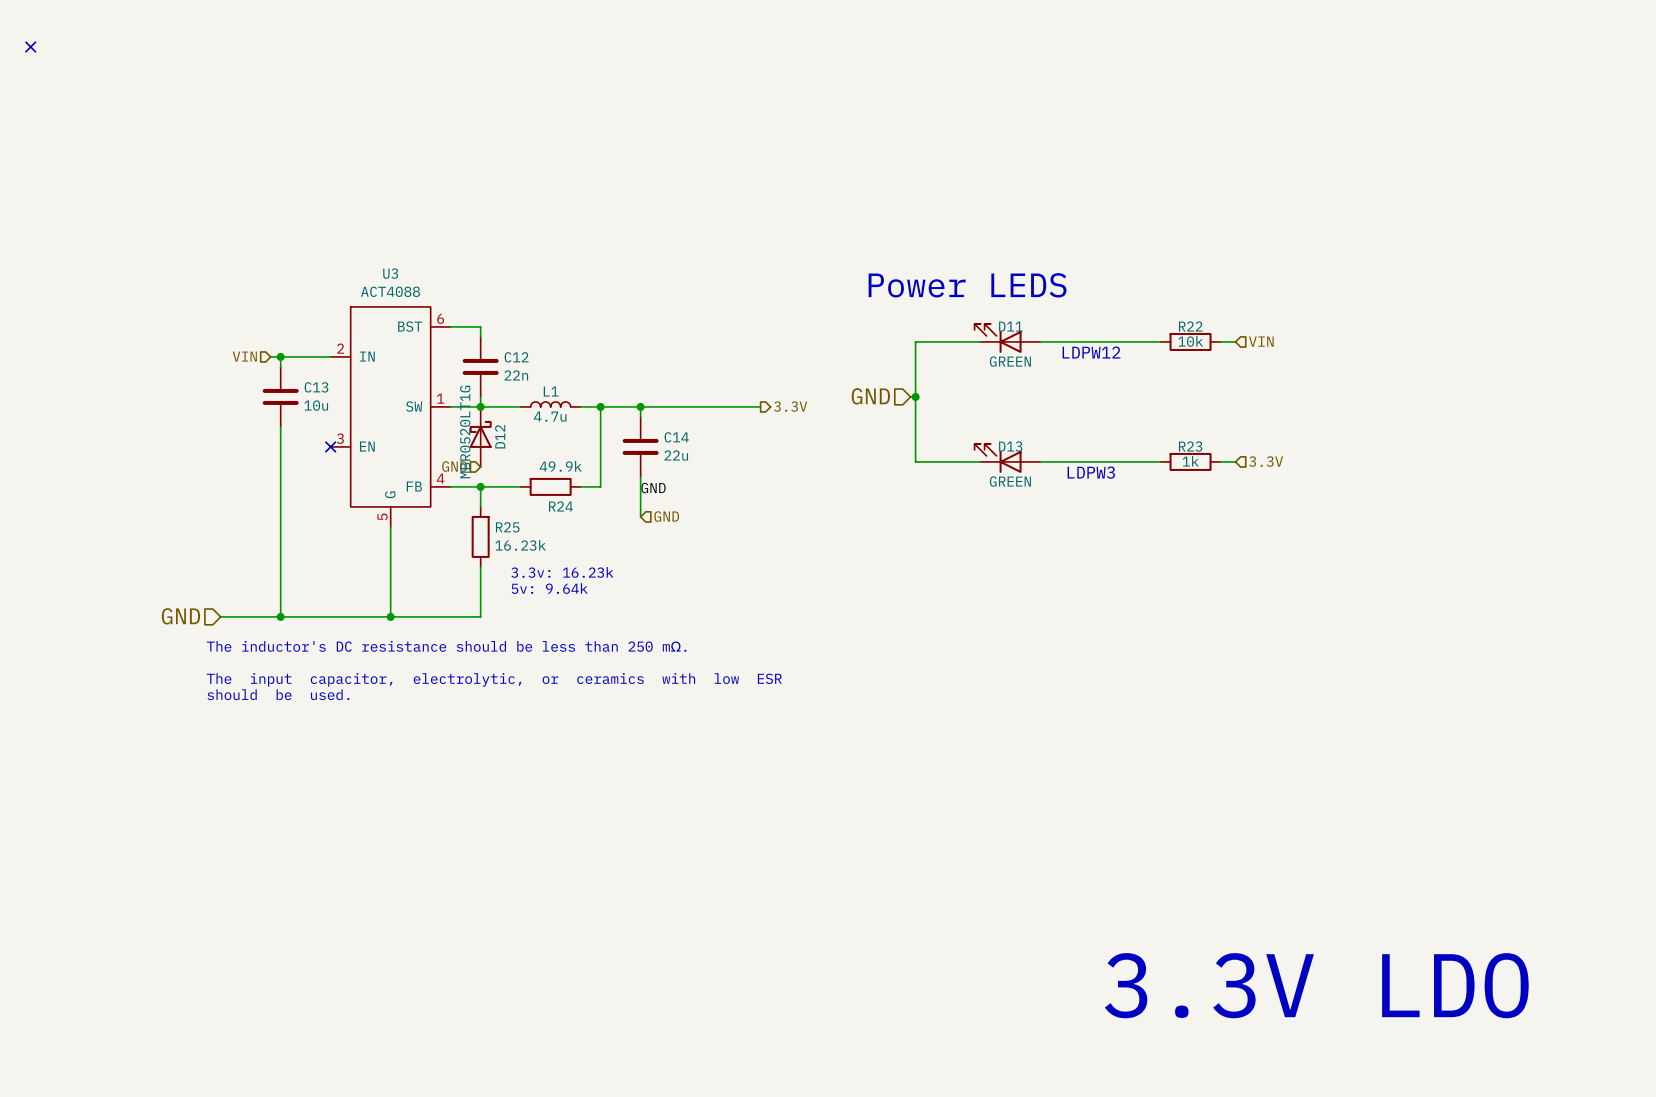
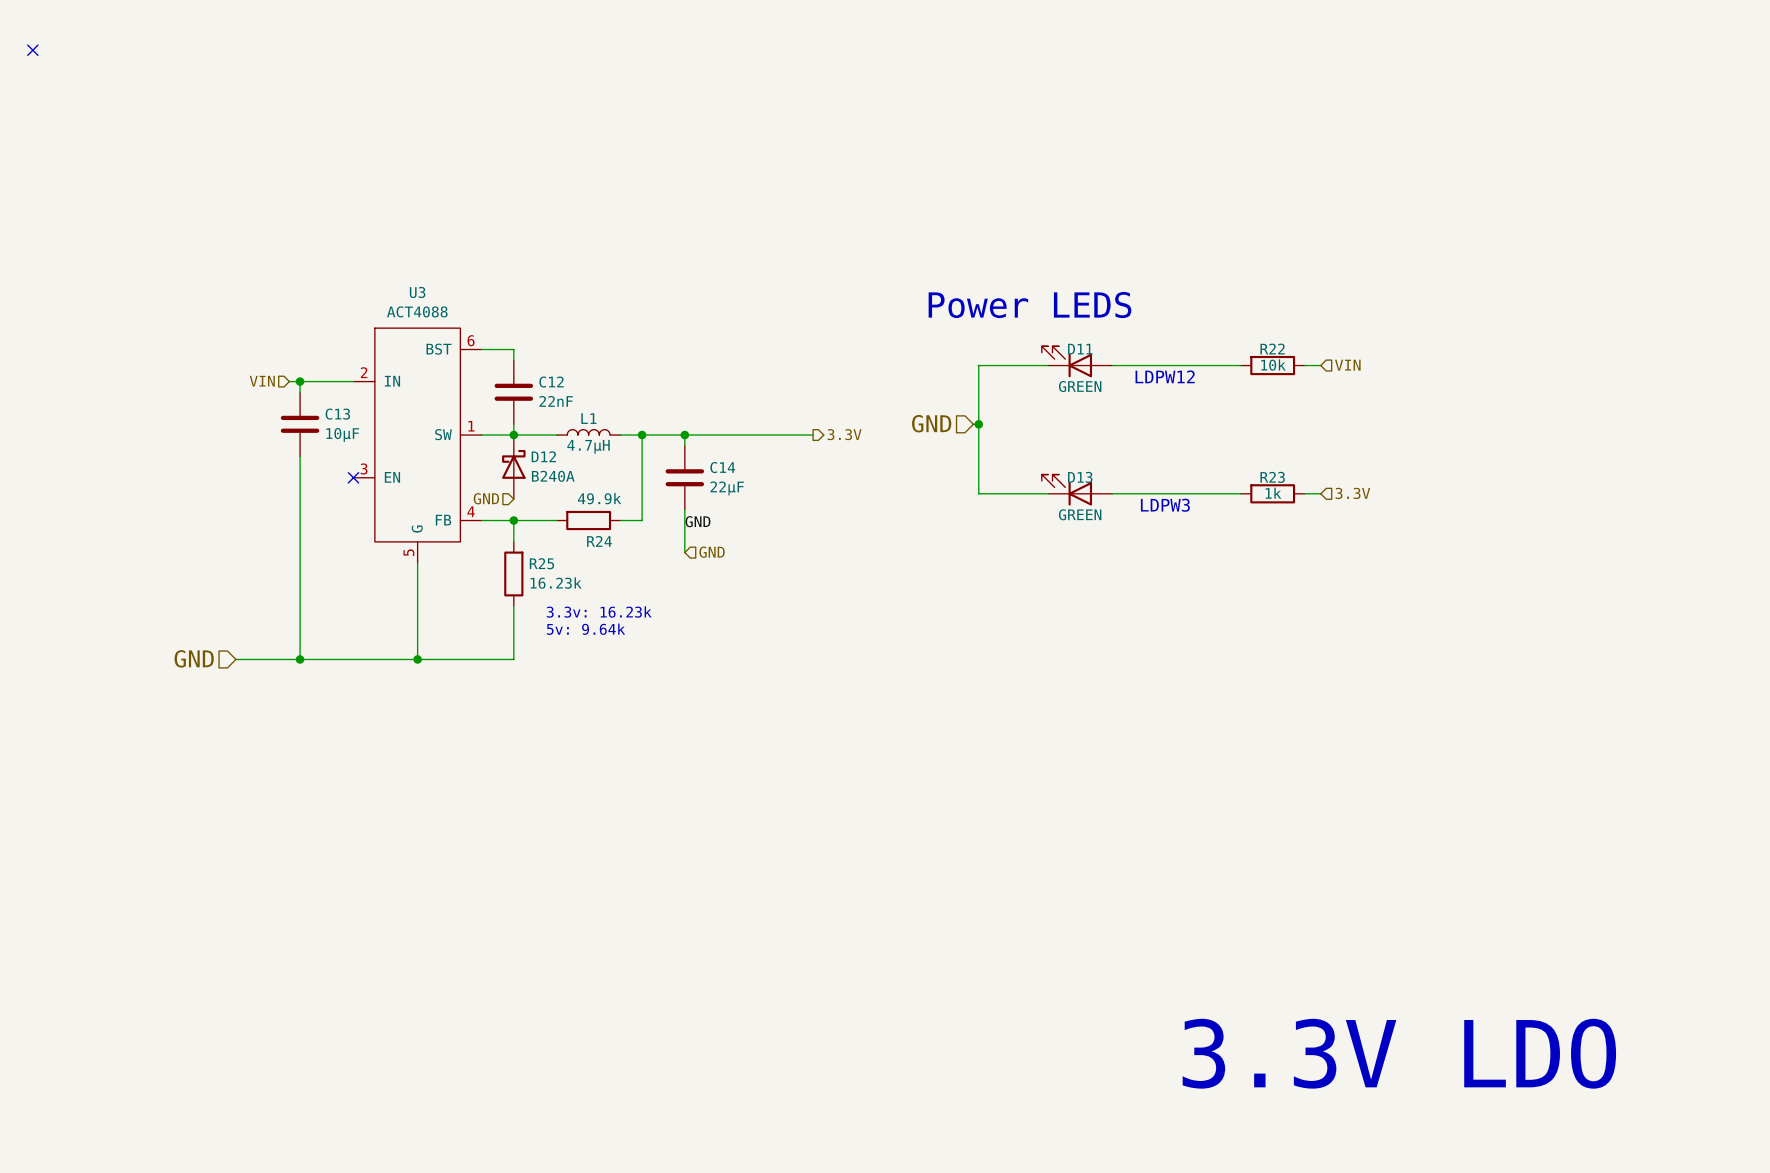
C12 value: 22n (516, 375) -> 22nF (556, 401)
C13 value: 10u (316, 405) -> 10µF (342, 434)
L1 value: 4.7u (550, 416) -> 4.7µH (588, 446)
D12 value: MBR0520LT1G (465, 432) -> B240A (553, 476)
D12 name rotation: 0° (500, 436) -> 90° clockwise (543, 456)
C14 value: 22u (676, 455) -> 22µF (727, 488)
text: The inductor's DC resistance should be less than 250 mΩ. (446, 646) -> none
text: The input capacitor, electrolytic, or ceramics with low ESR (494, 679) -> none
text: should be used. (278, 694) -> none

